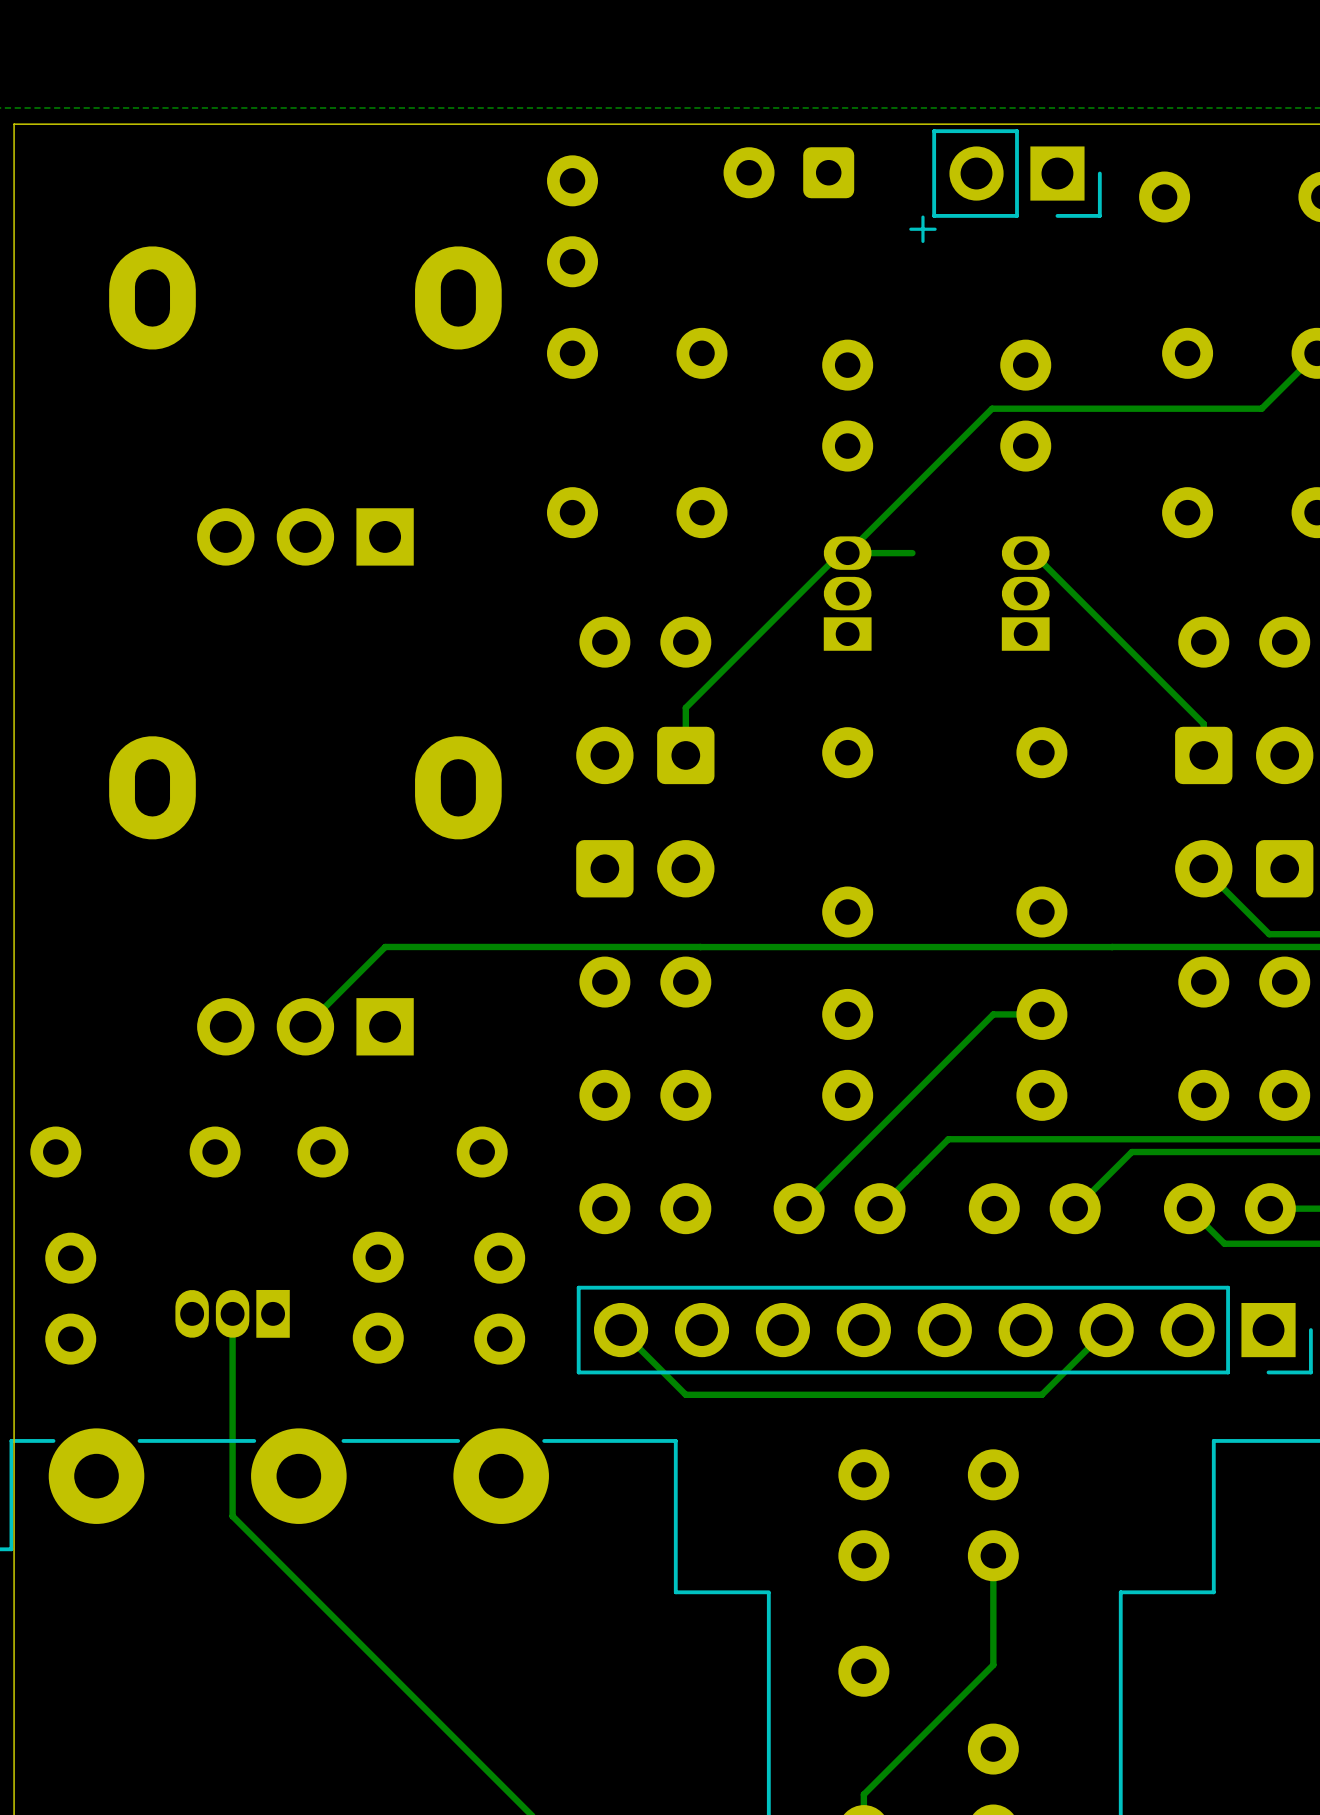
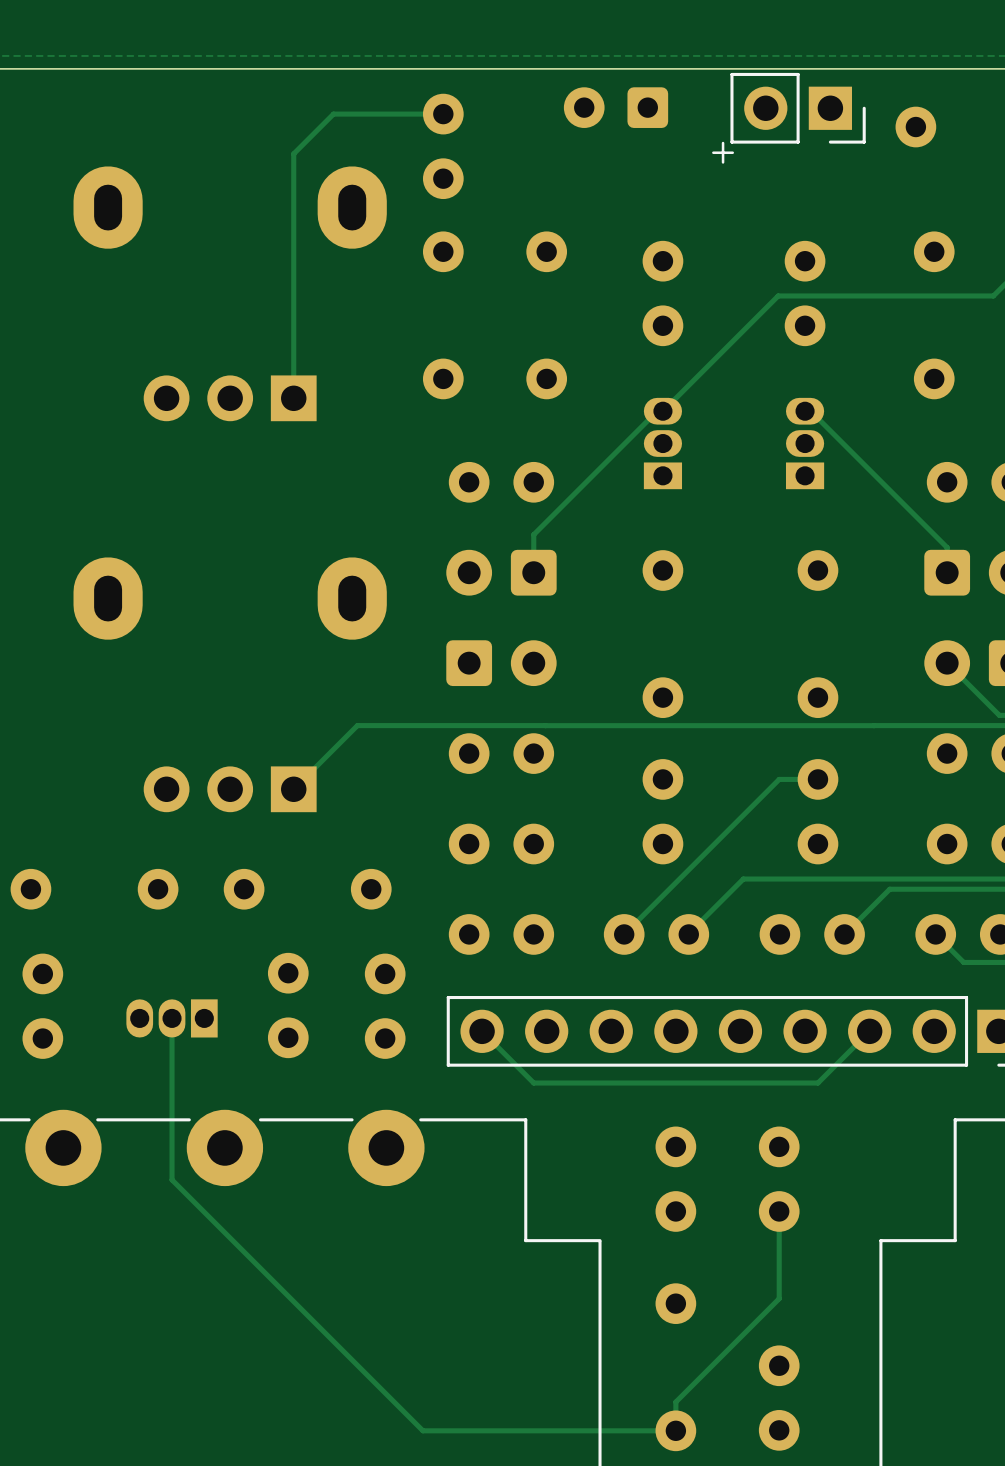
track: none -> (443, 114) (333, 114) (293, 153) (293, 398)
track: (912, 553) (840, 553) -> none
track: (464, 946) (385, 946) (305, 1026) -> (357, 725) (293, 789)

